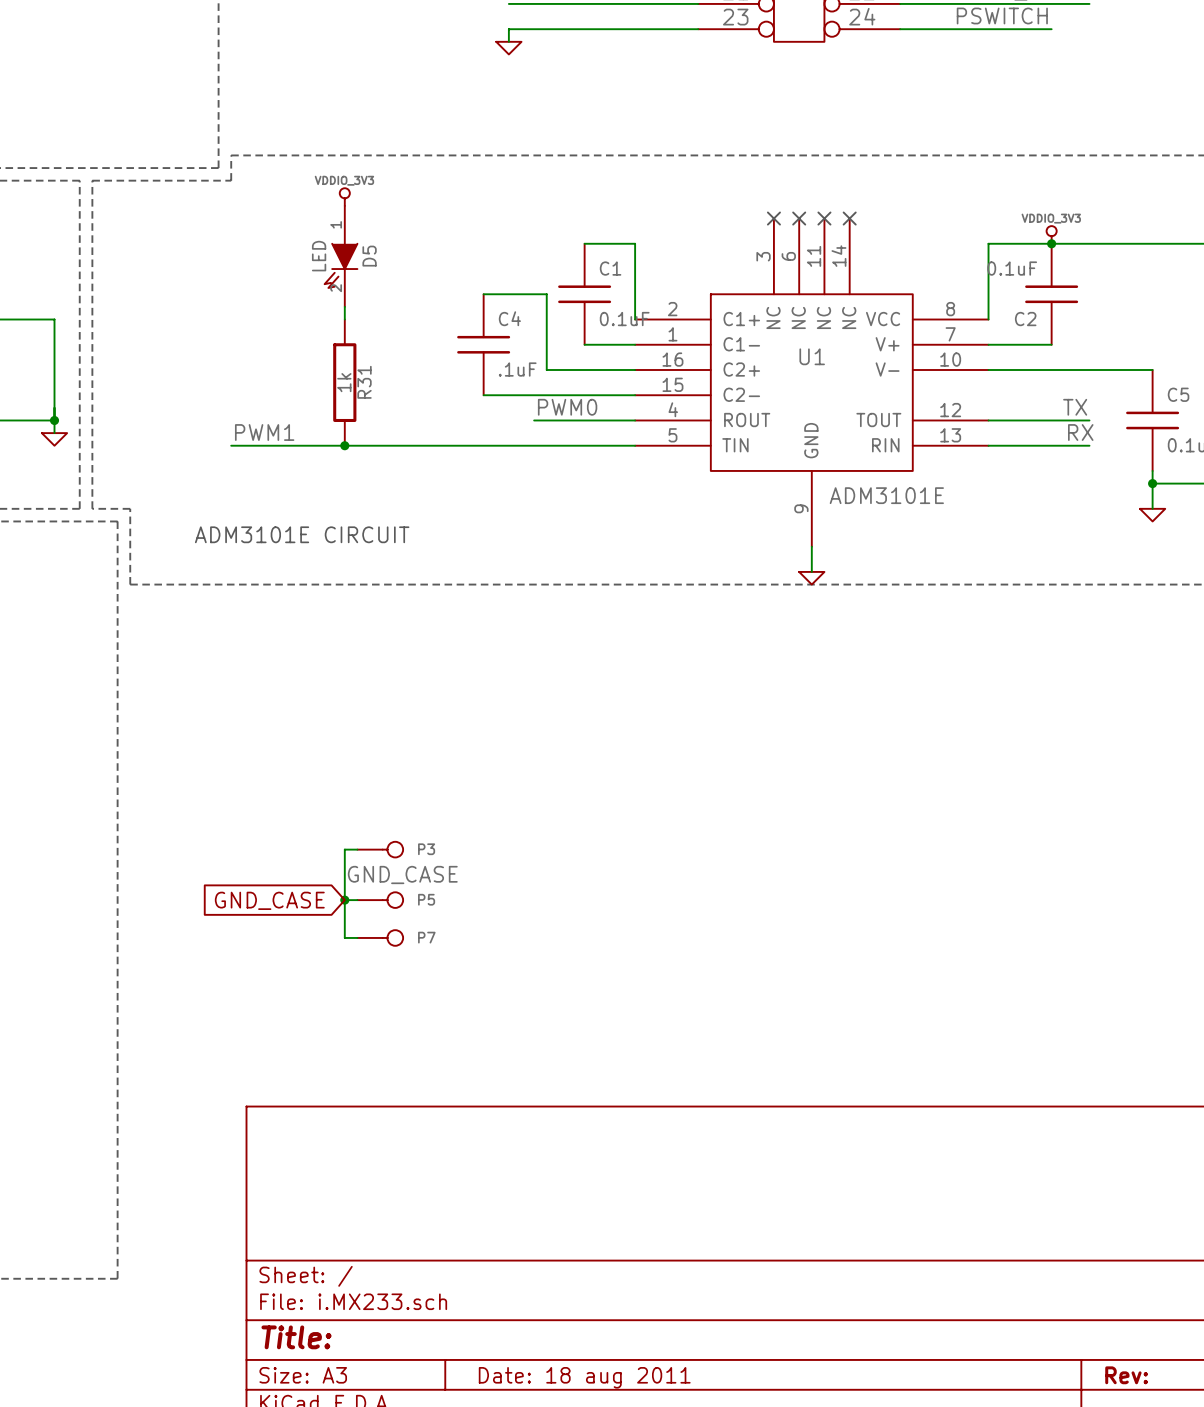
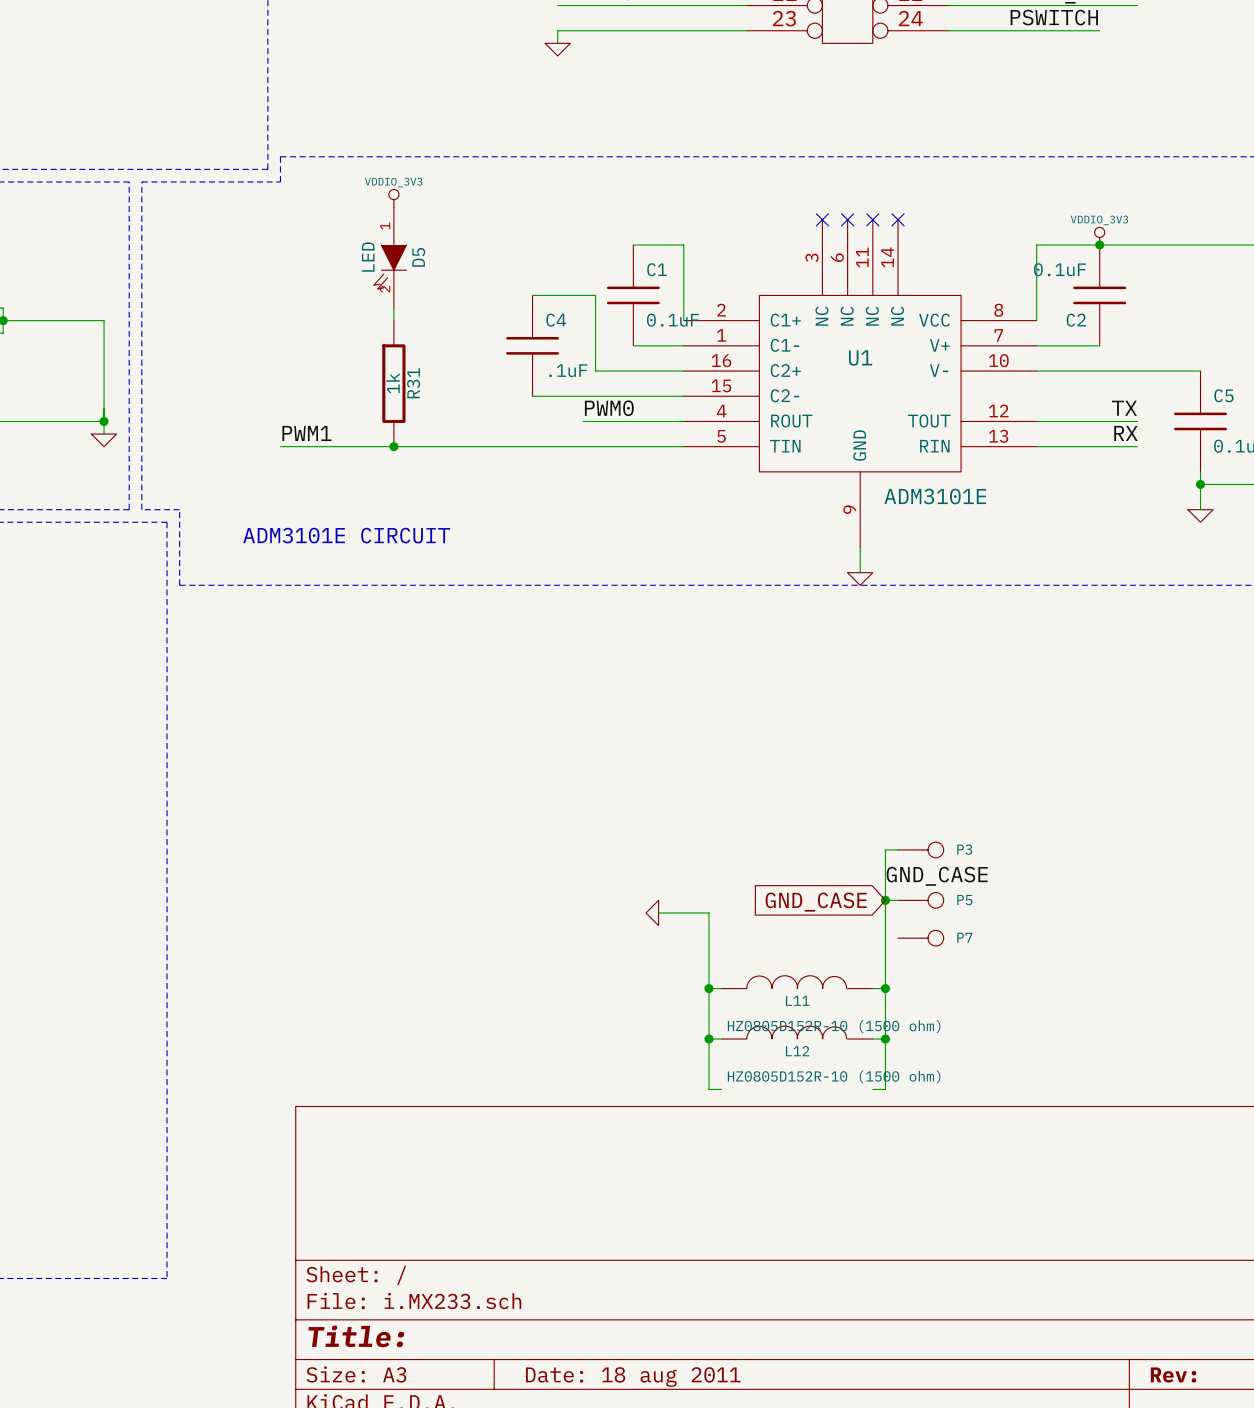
wire: (357, 849) (344, 849) (344, 937) (357, 937) -> none
P3 position: (380, 849) -> (920, 849)
wire: none -> (898, 849) (885, 849) (885, 1089) (872, 1089)
label: GND_CASE (402, 875) -> none
label: none -> GND_CASE (937, 876)
global label: GND_CASE (269, 900) -> none
wire: (344, 900) (357, 900) -> none
junction: (344, 900) -> none
P5 position: (380, 900) -> (920, 900)
global label: none -> GND_CASE (816, 902)
wire: none -> (885, 900) (898, 900)
junction: none -> (885, 900)
power symbol: none -> (652, 912)
wire: none -> (658, 912) (708, 912) (708, 1089) (721, 1089)
P7 position: (380, 937) -> (920, 938)
L11: none -> HZ0805D152R-10 (1500 ohm) (797, 982)
wire: none -> (708, 988) (721, 988)
junction: none -> (708, 988)
wire: none -> (872, 988) (885, 988)
junction: none -> (885, 988)
L12: none -> HZ0805D152R-10 (1500 ohm) (797, 1032)
wire: none -> (708, 1039) (721, 1039)
junction: none -> (708, 1039)
wire: none -> (872, 1039) (885, 1039)
junction: none -> (885, 1039)

